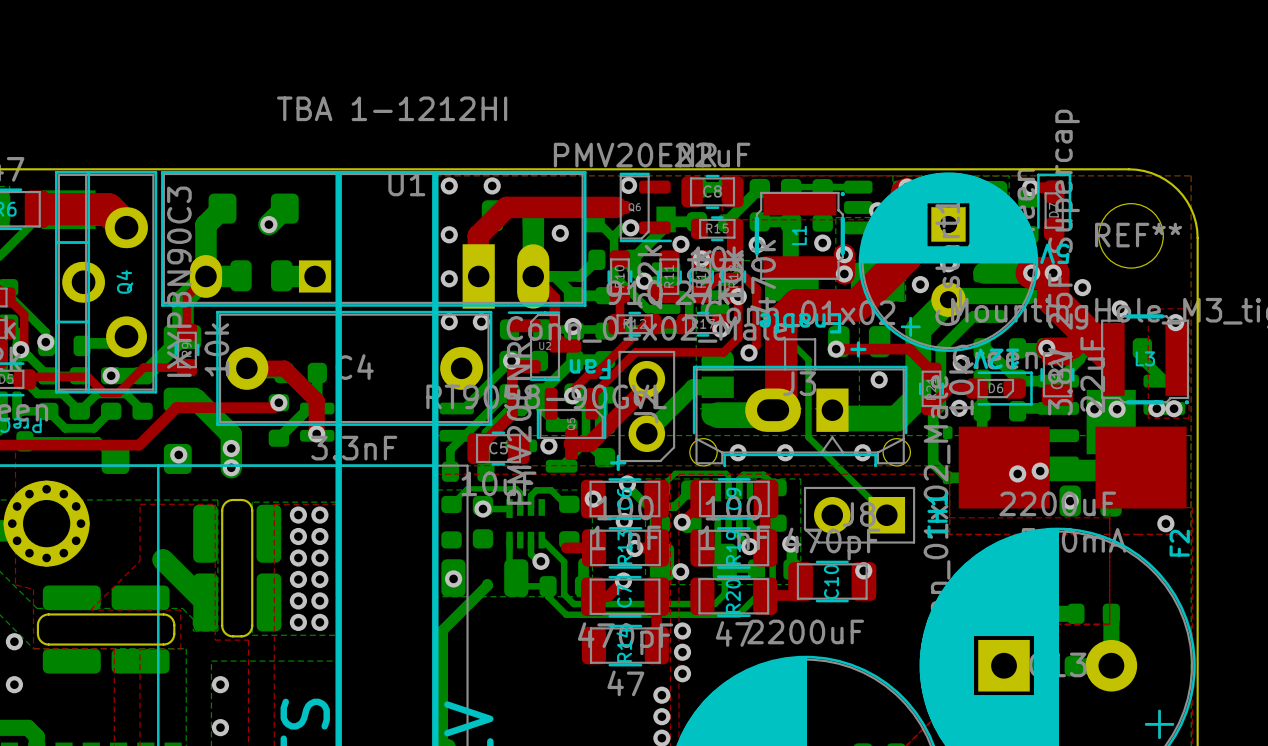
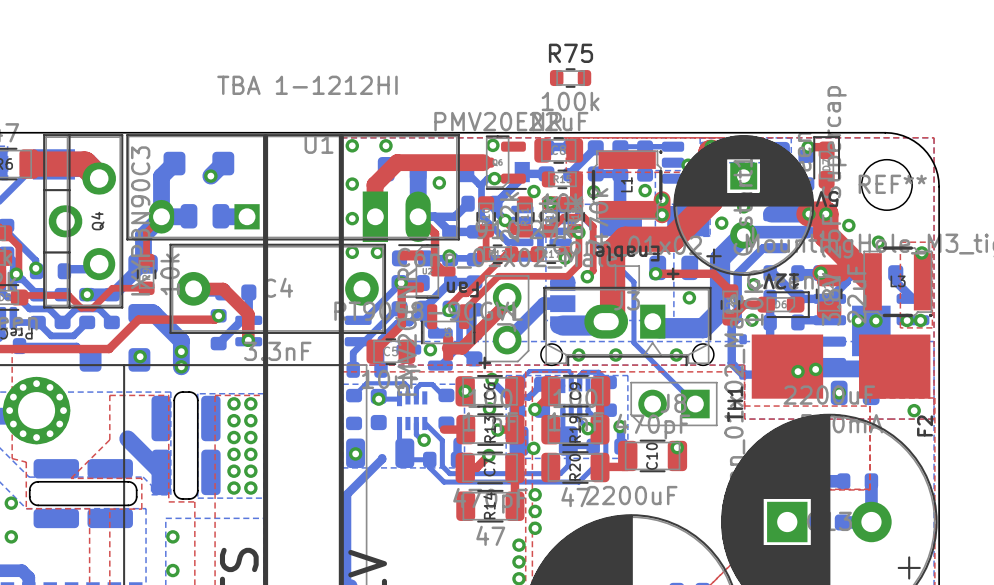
R75: none -> 100k (570, 78)

